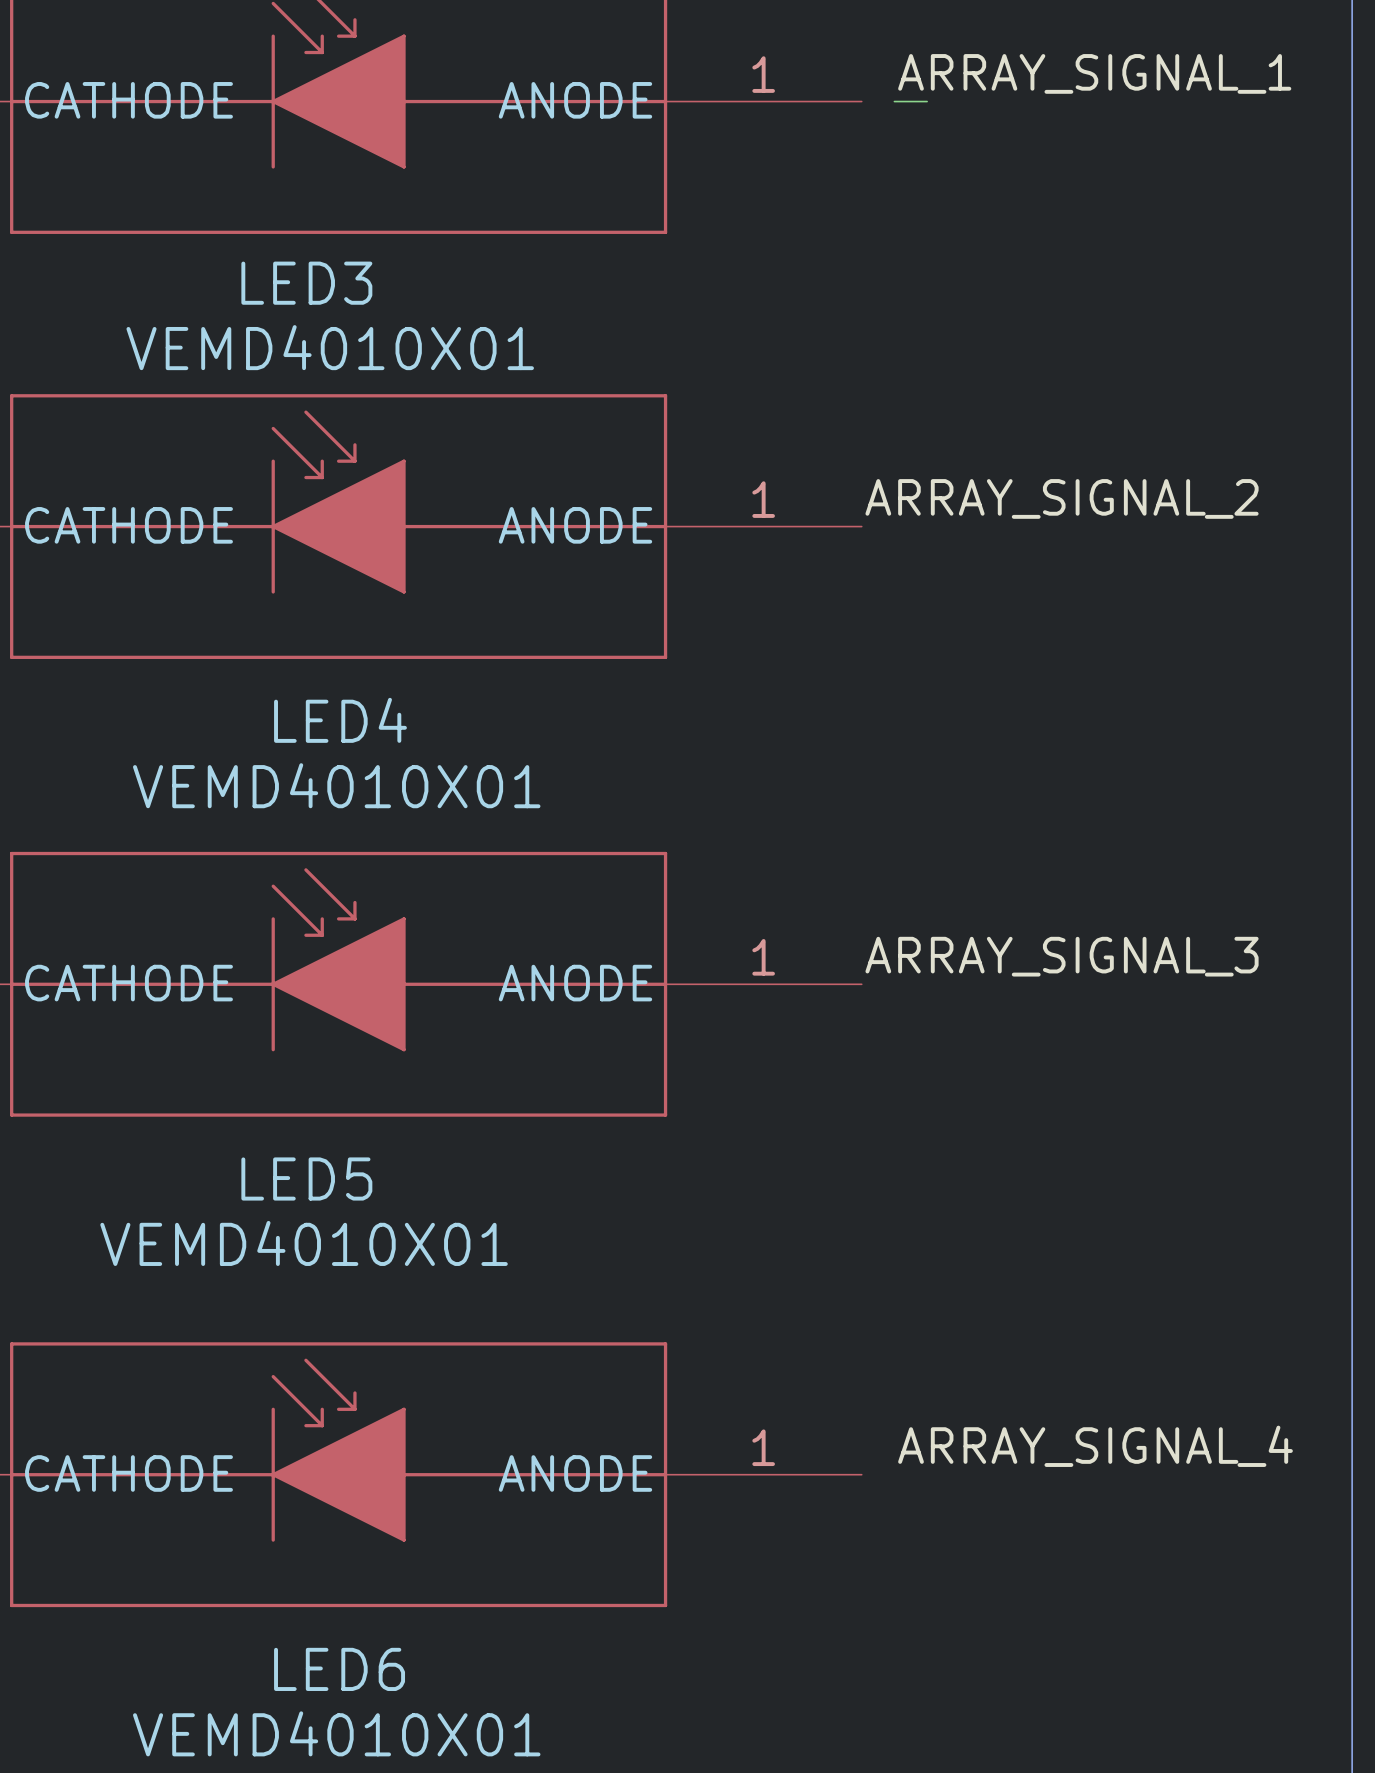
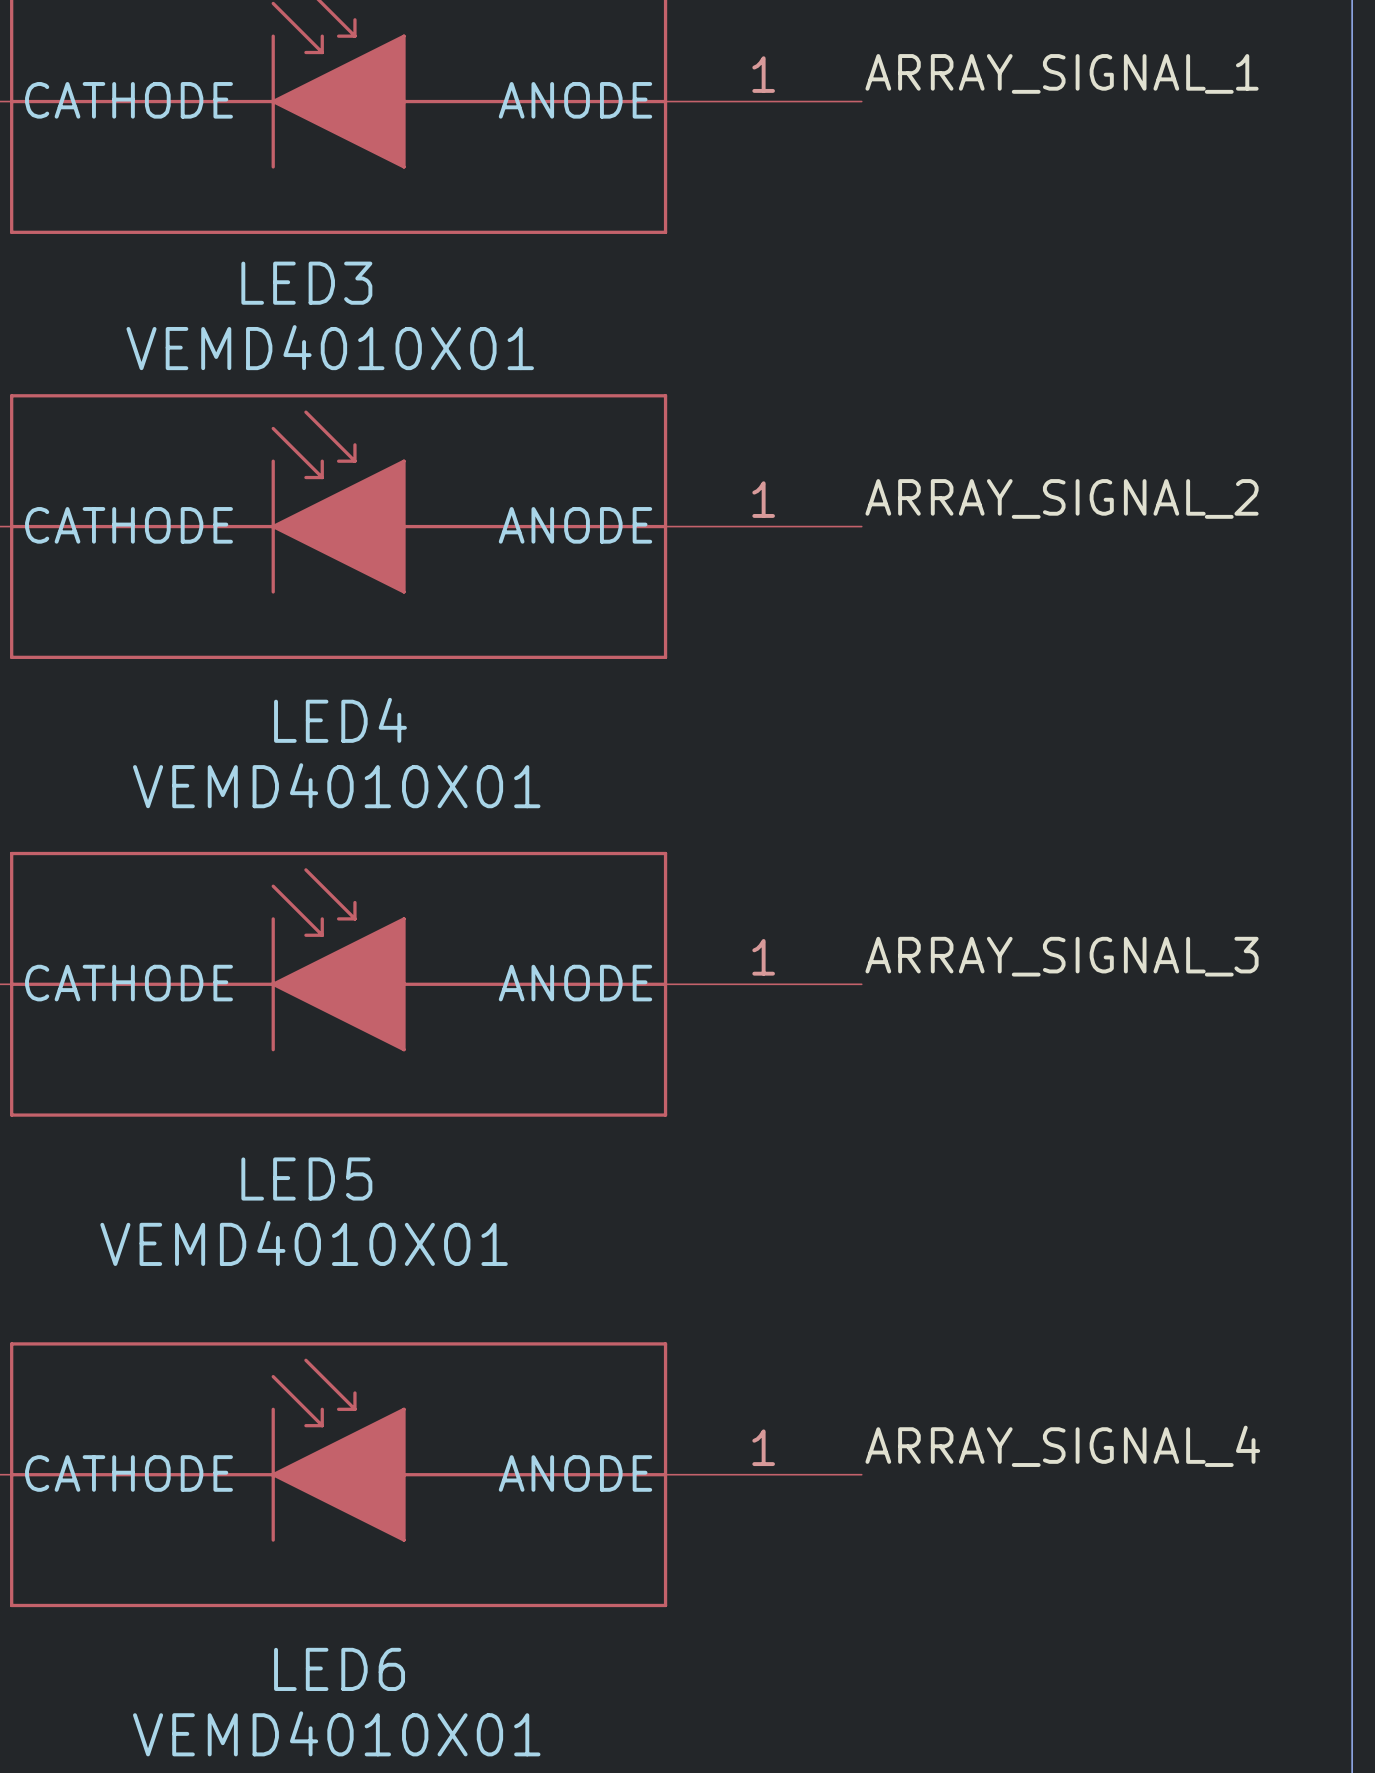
label position: ARRAY_SIGNAL_1 (1094, 73) -> ARRAY_SIGNAL_1 (1062, 73)
wire: (894, 101) (927, 101) -> none
label position: ARRAY_SIGNAL_4 (1095, 1446) -> ARRAY_SIGNAL_4 (1062, 1446)

